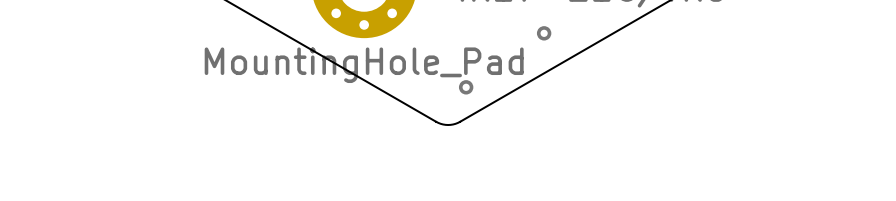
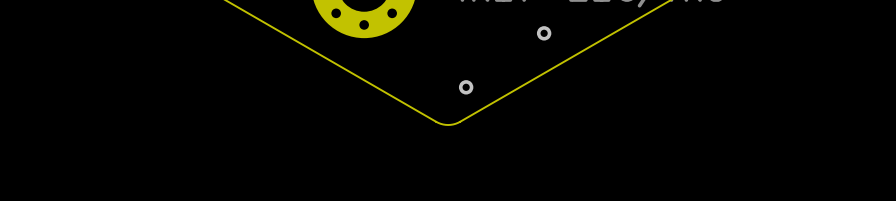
part value: MountingHole_Pad (364, 65) -> none

